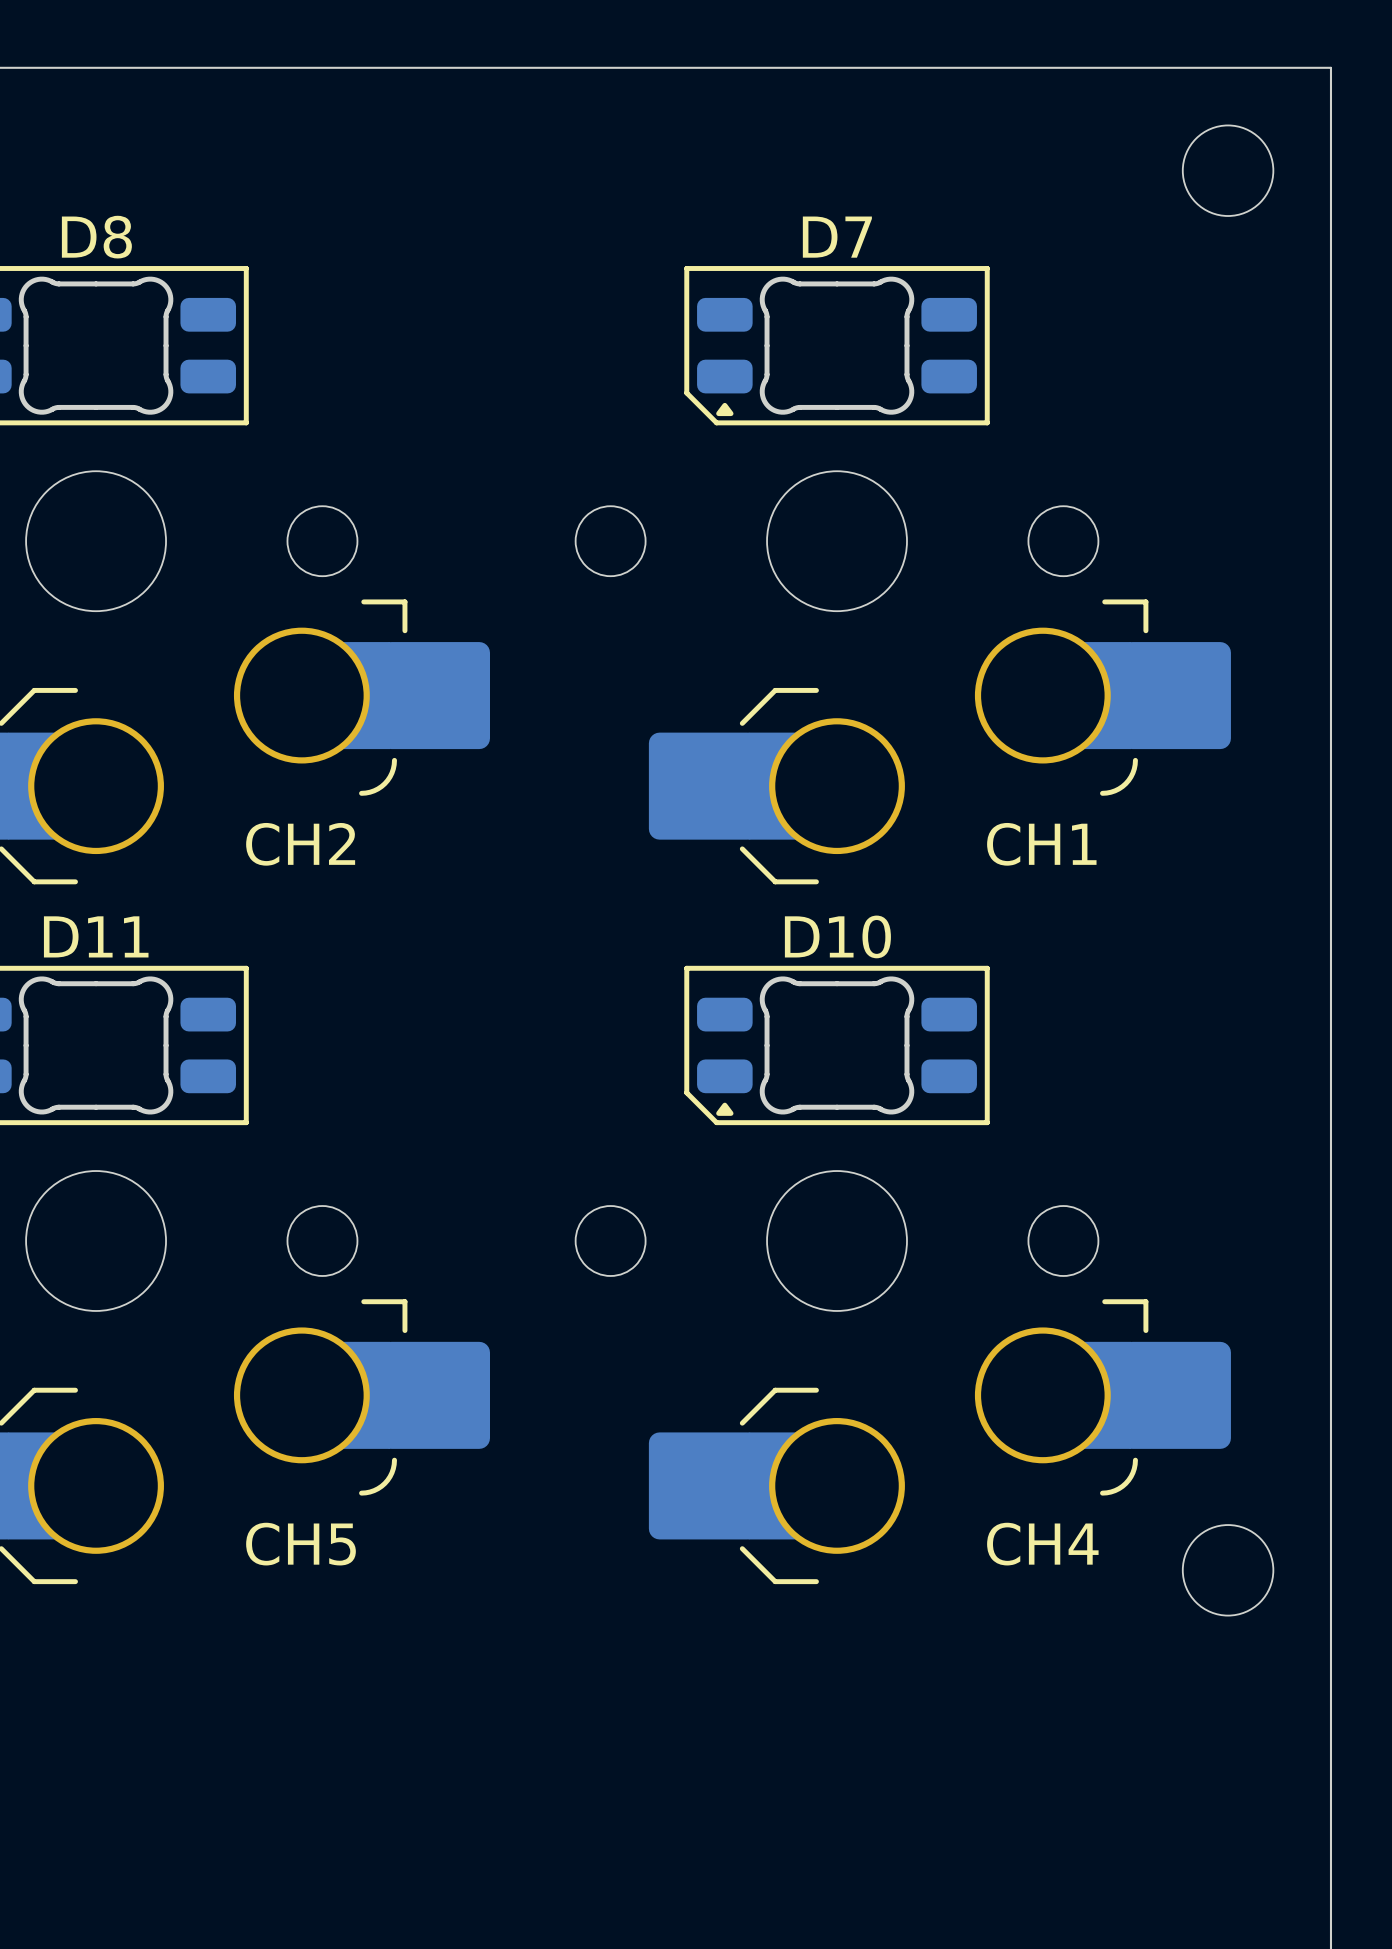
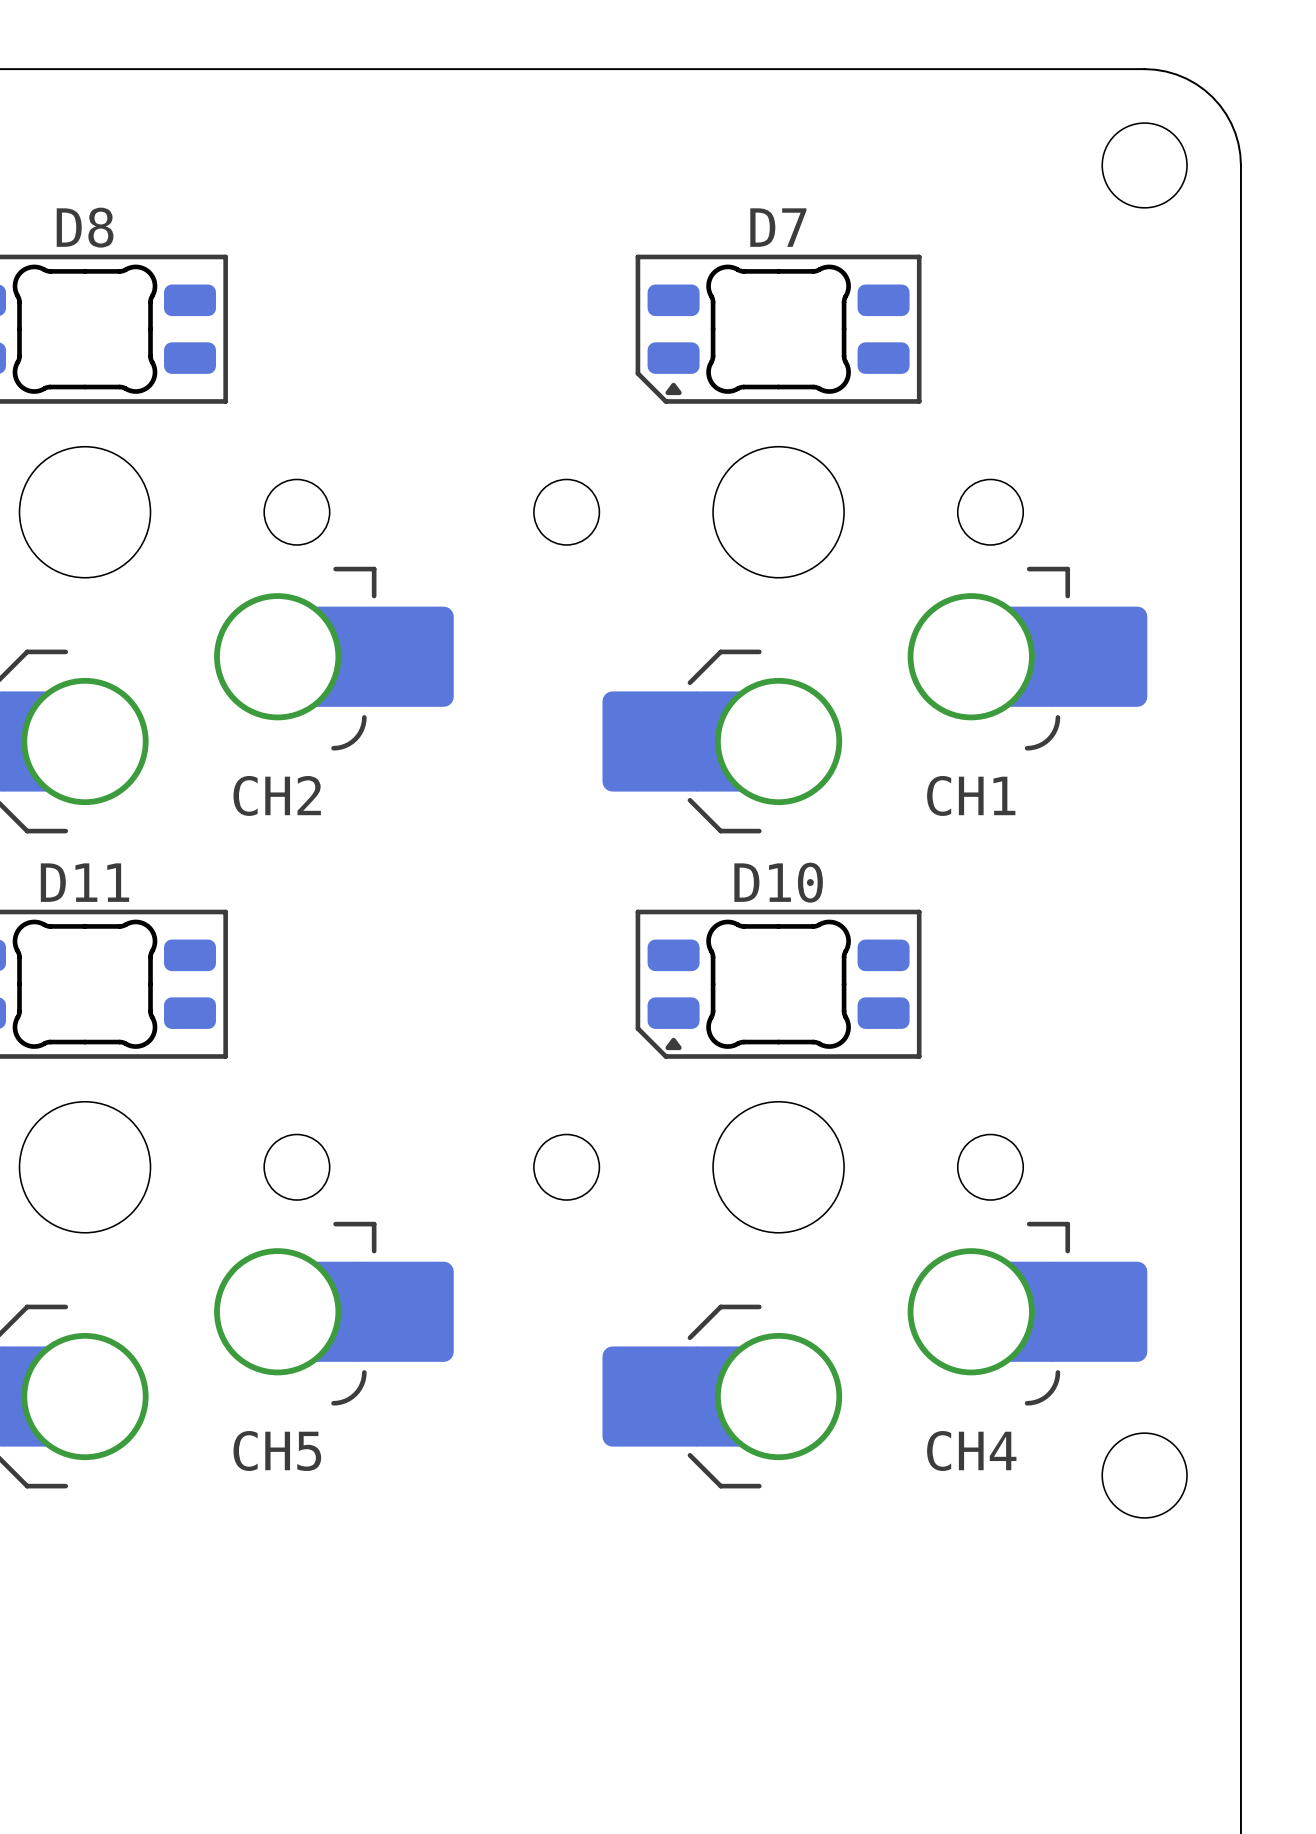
board edge: (1228, 67) (1330, 67) (1330, 170) -> (1144, 69) (1176, 74) (1195, 83) (1212, 97) (1226, 114) (1235, 133) (1240, 165)

